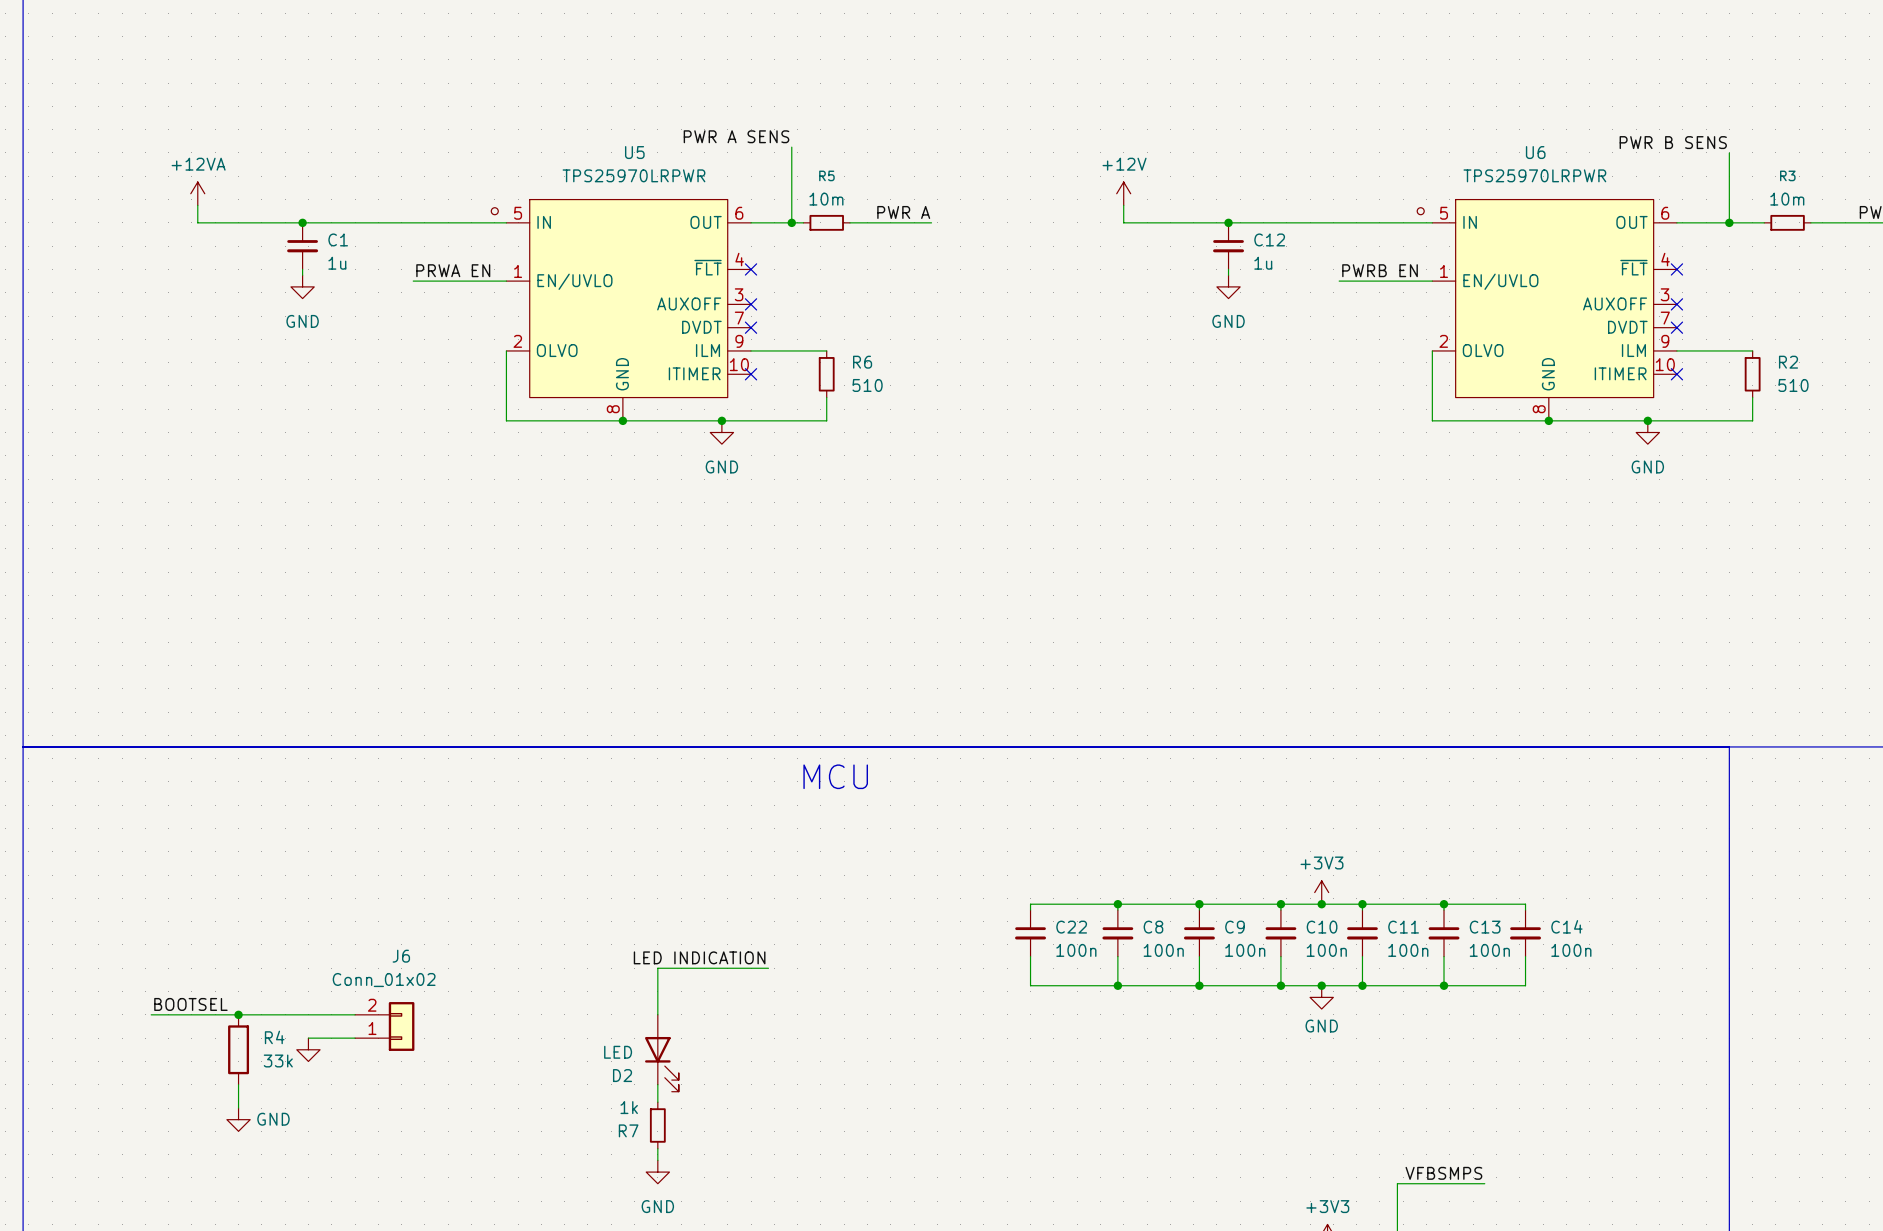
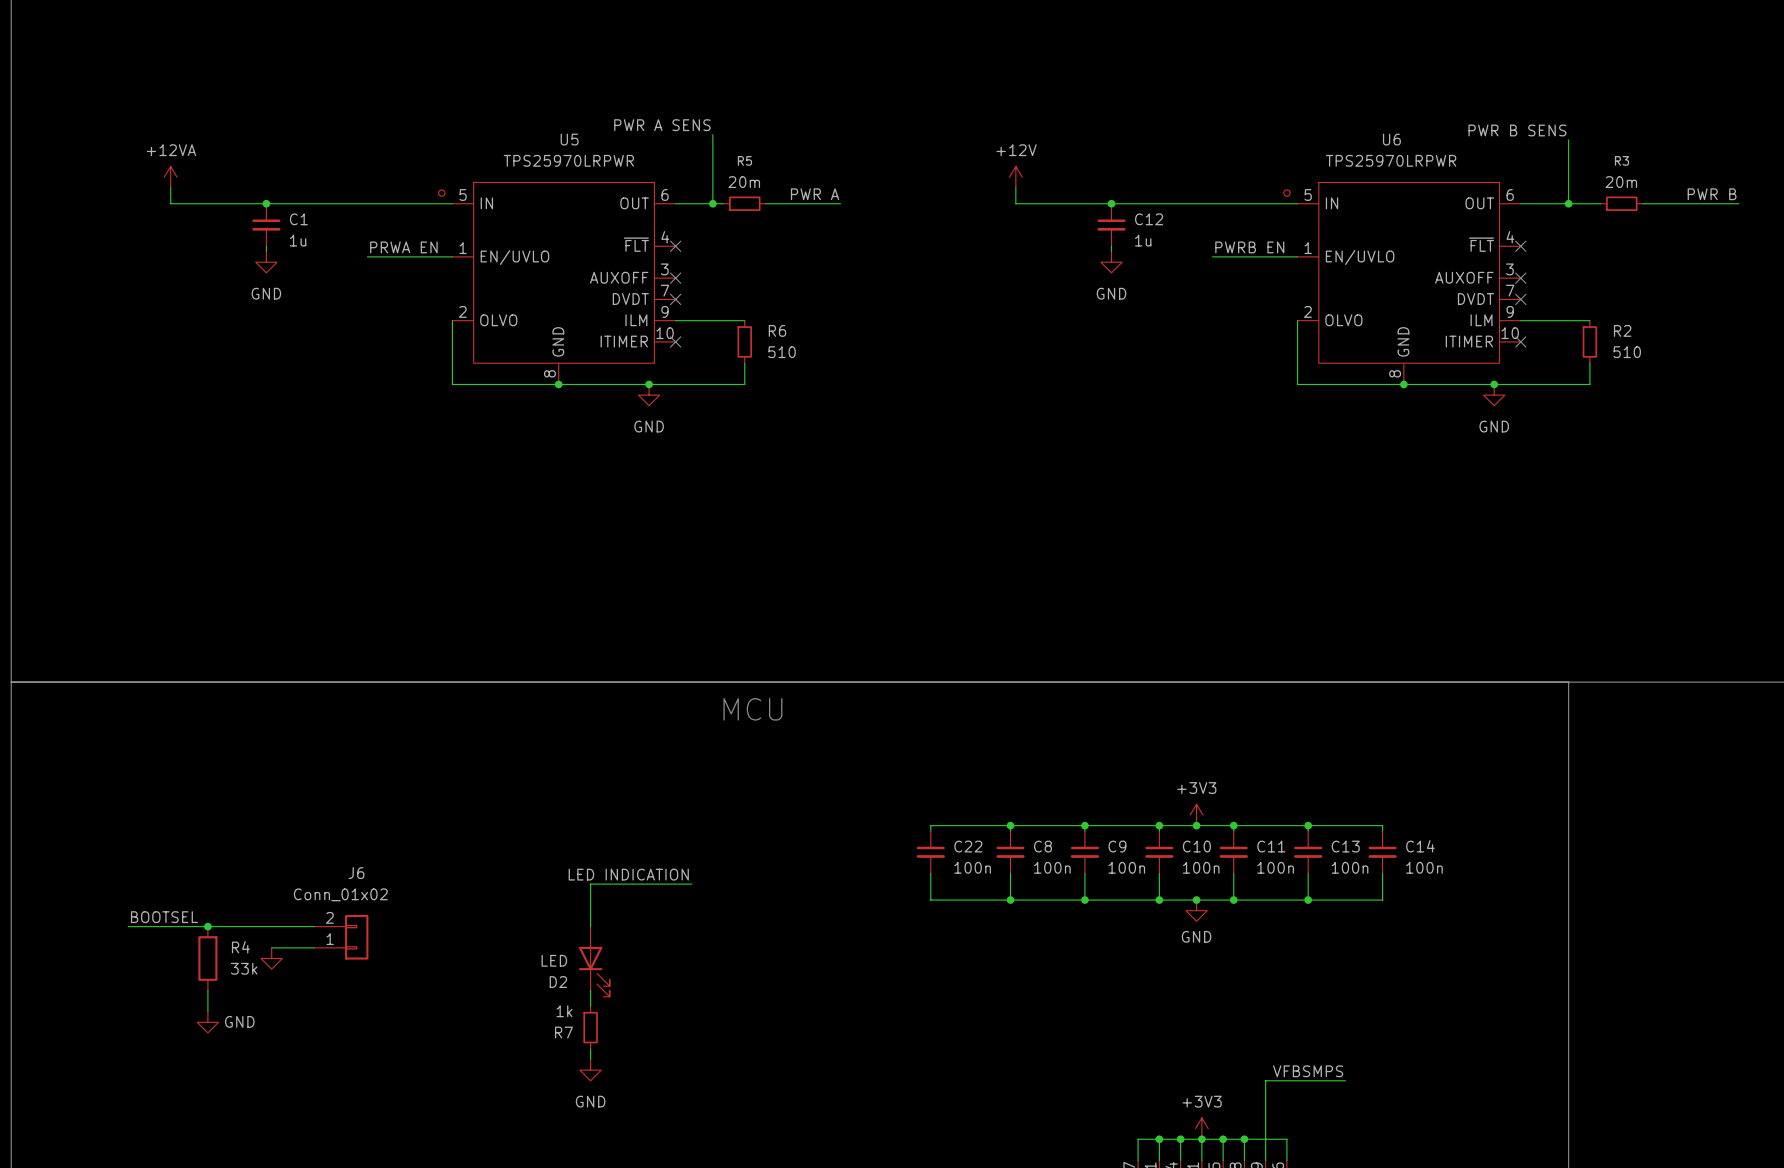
R5 value: 10m (826, 199) -> 20m (744, 182)
R3 value: 10m (1787, 199) -> 20m (1621, 182)

